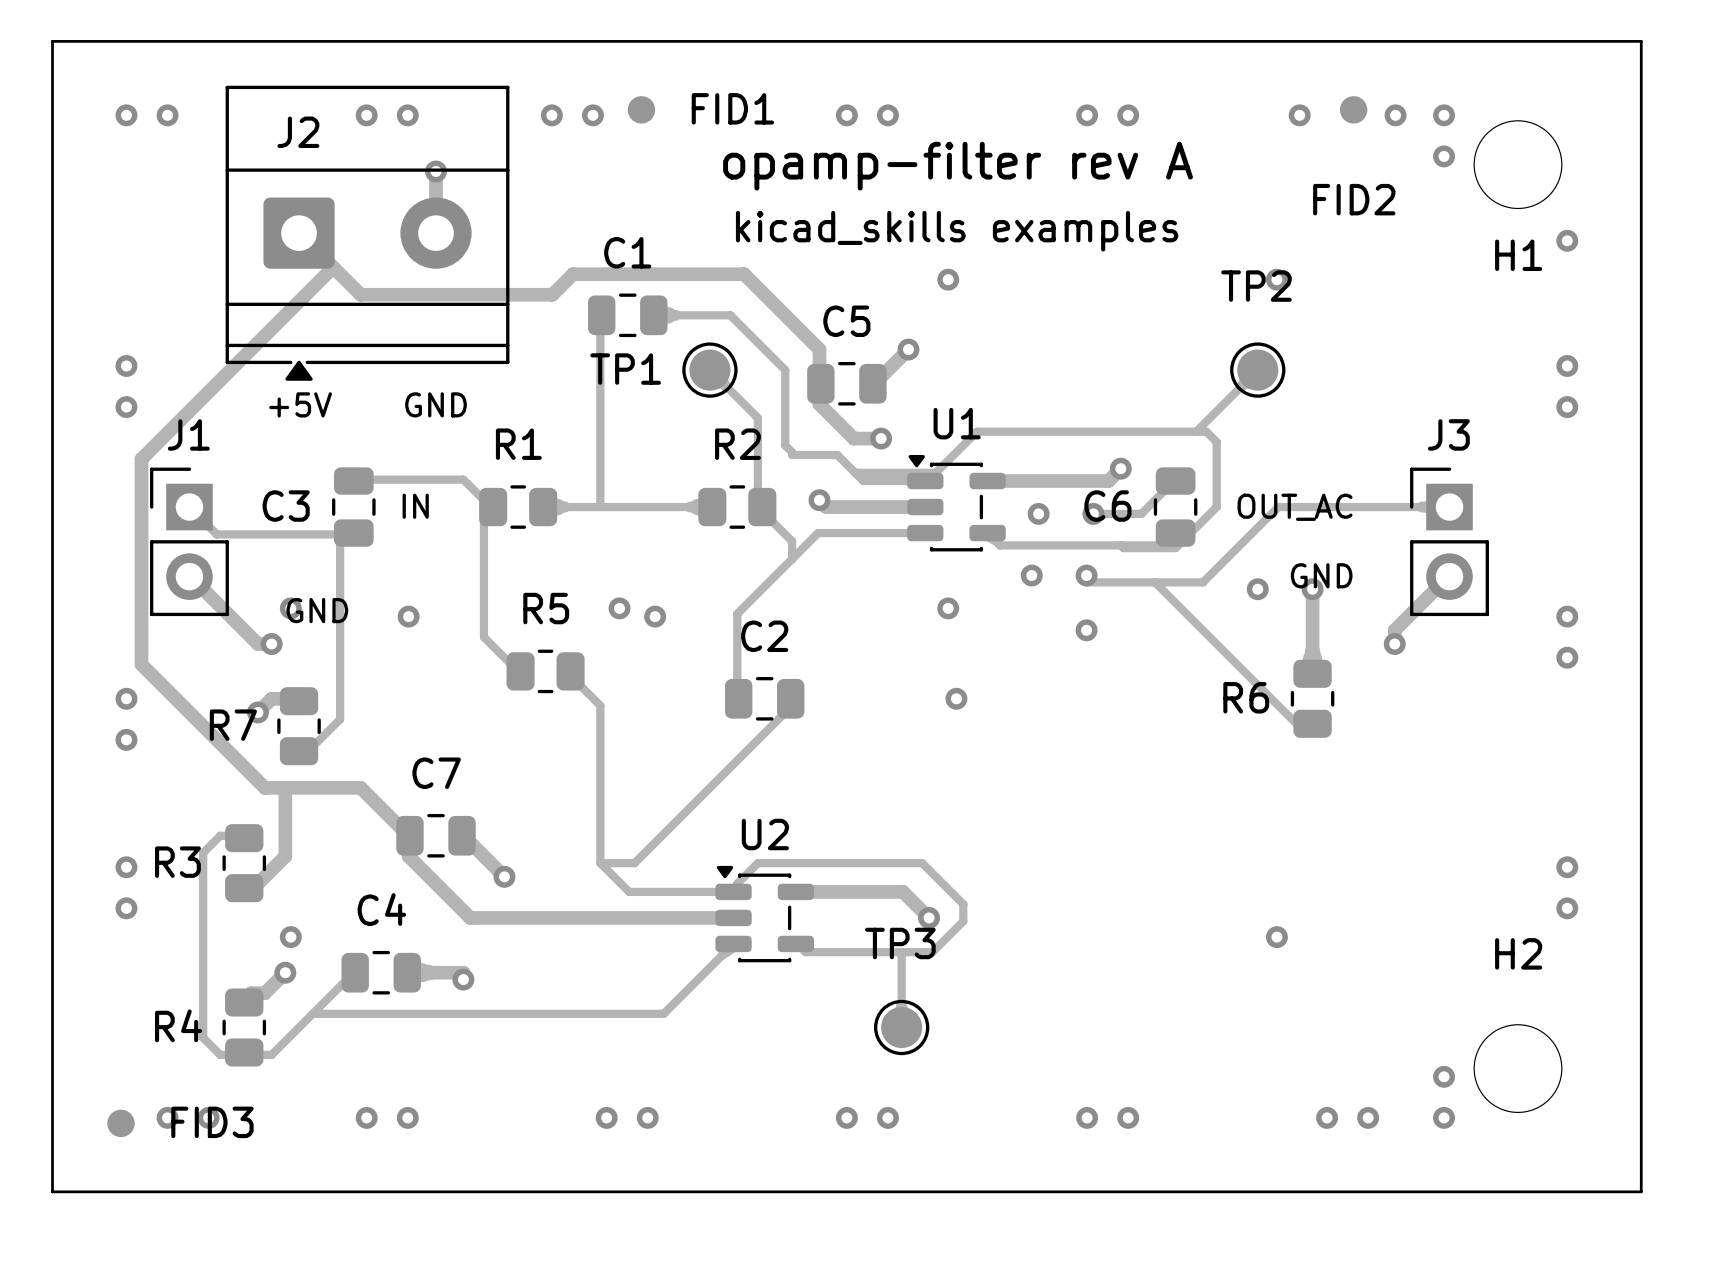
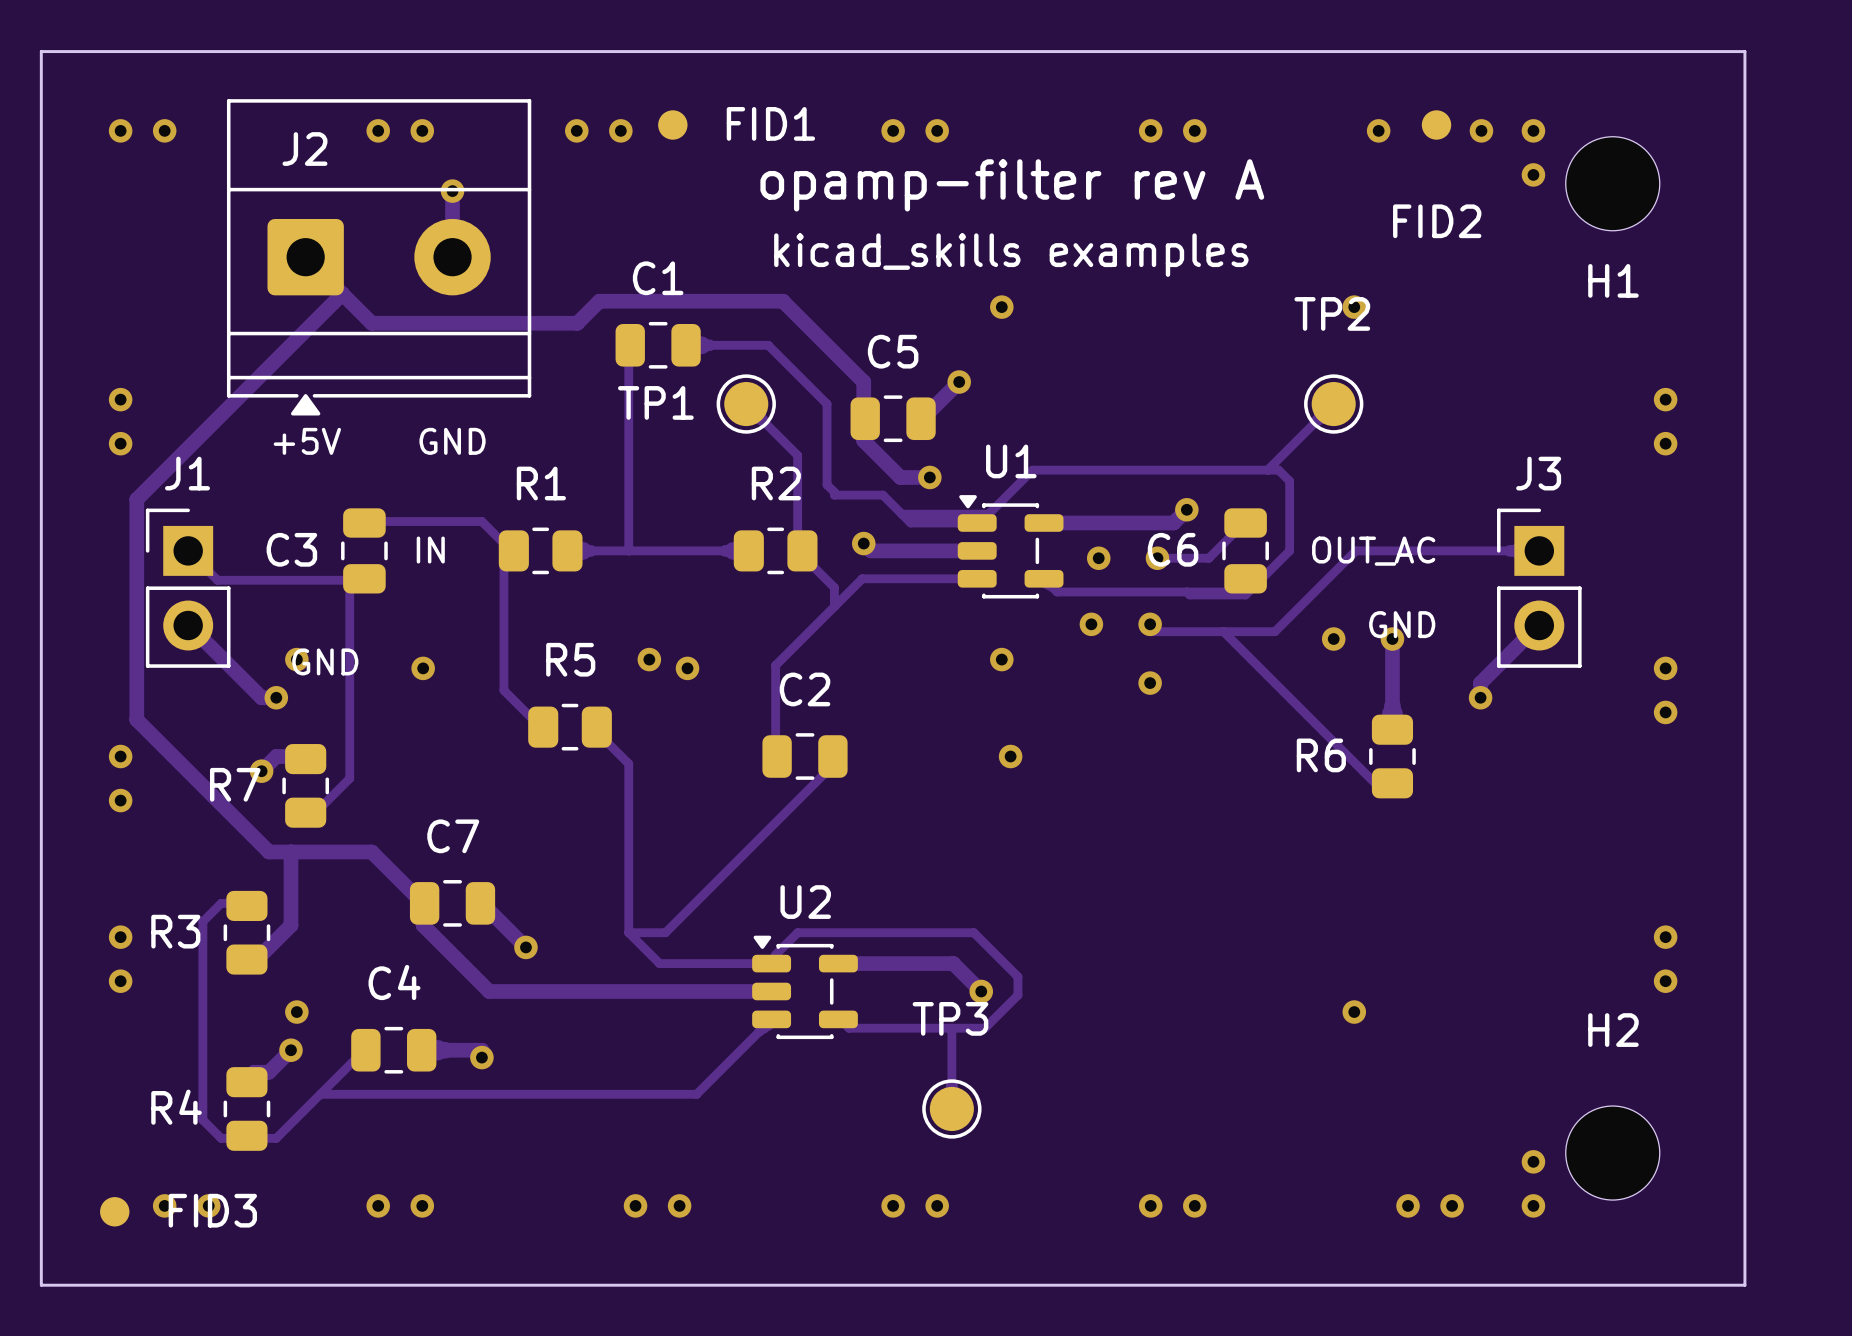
via: (1567, 240) -> none

